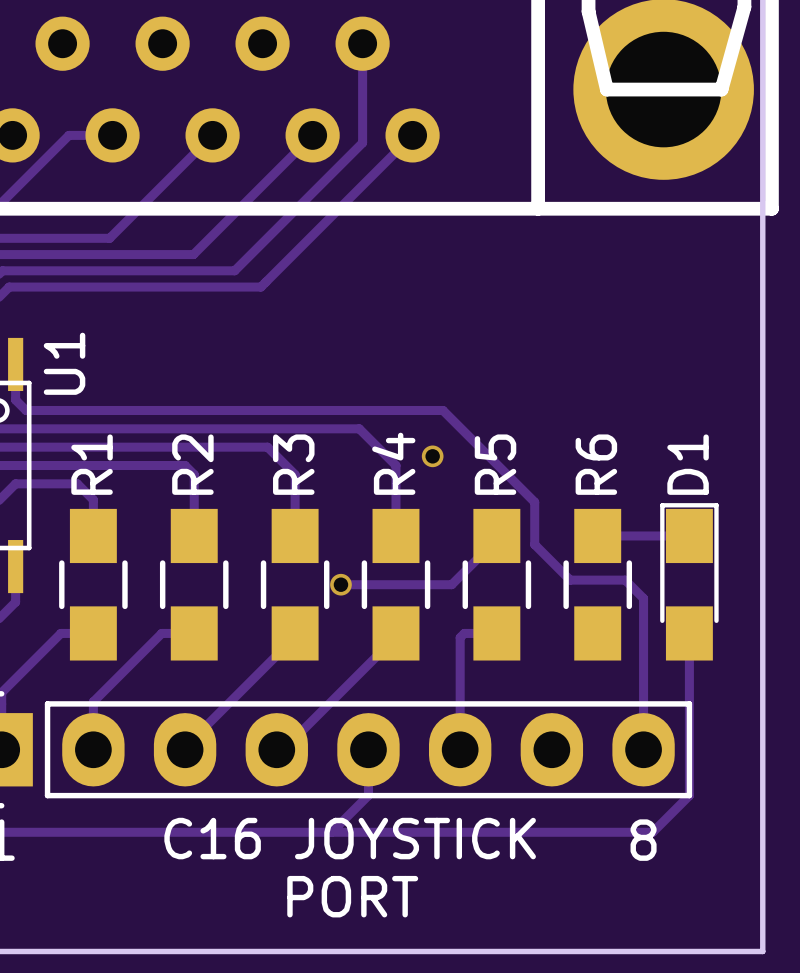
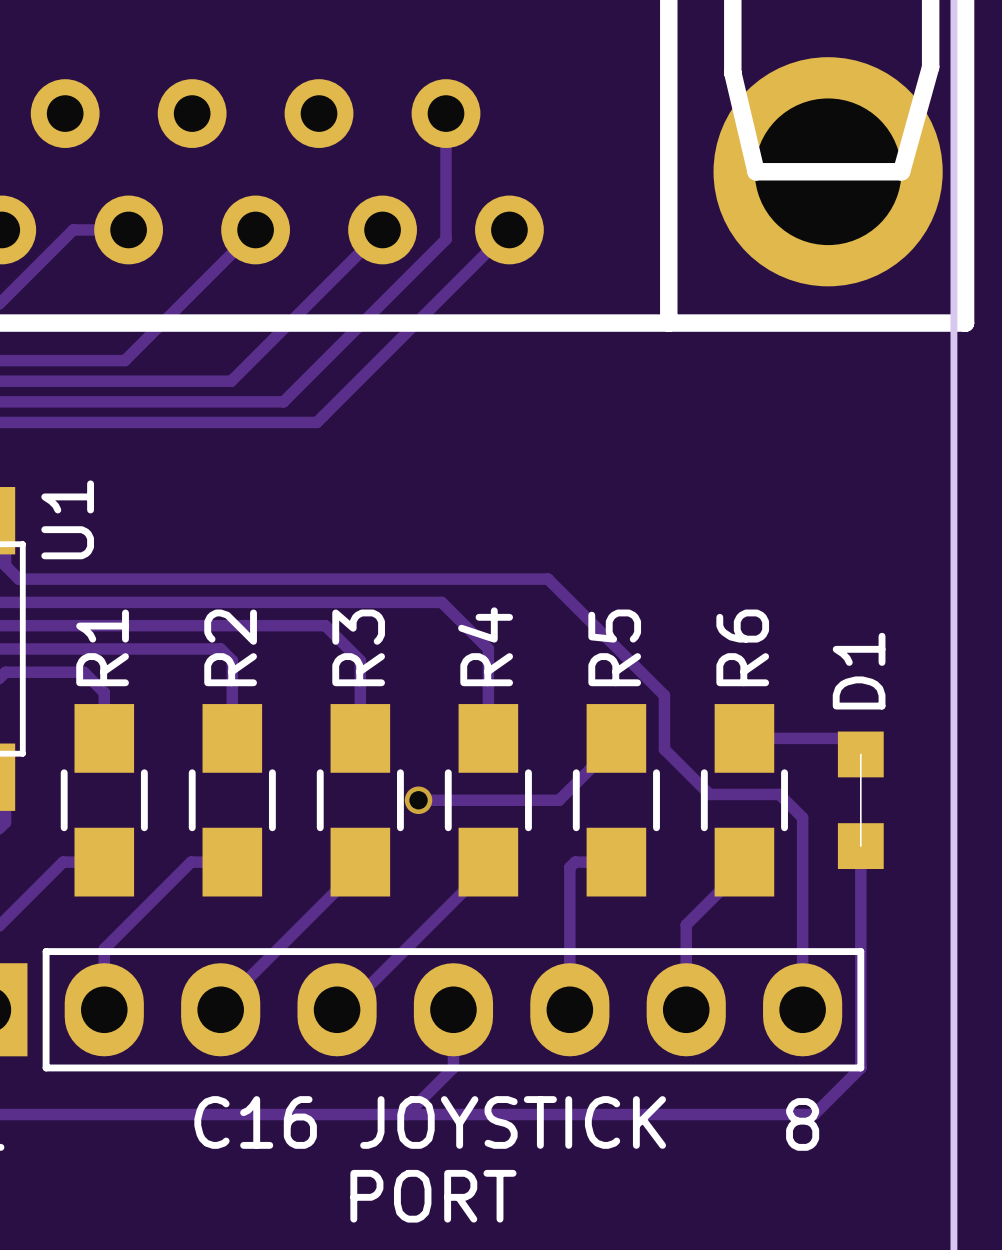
via: (432, 456) -> none
D1 footprint: [660, 503, 719, 661] -> [837, 731, 884, 870]
track: none -> (744, 866) (686, 924) (686, 1009)

